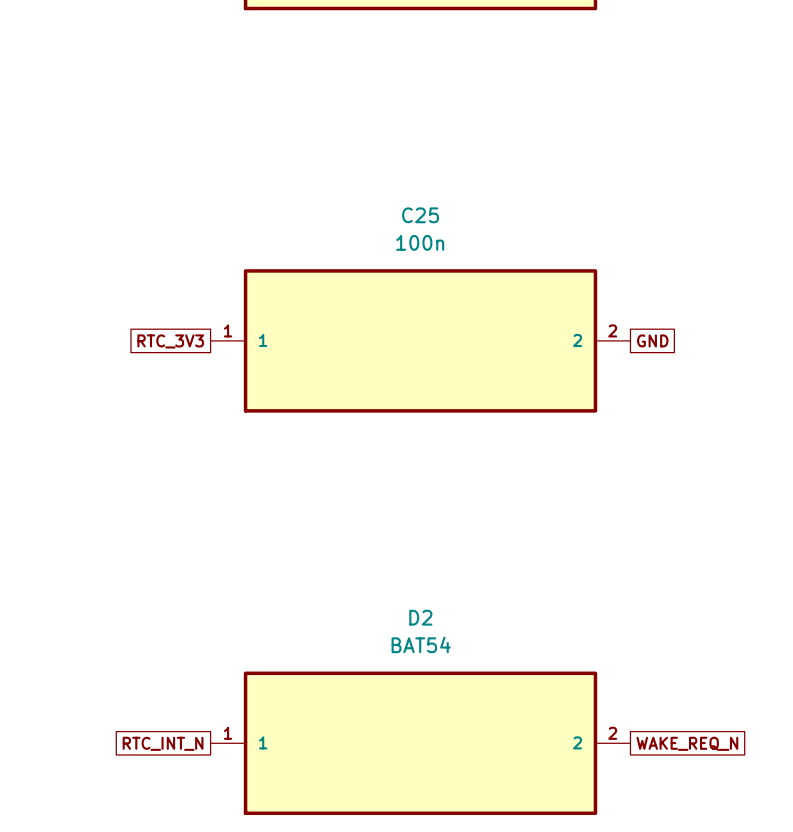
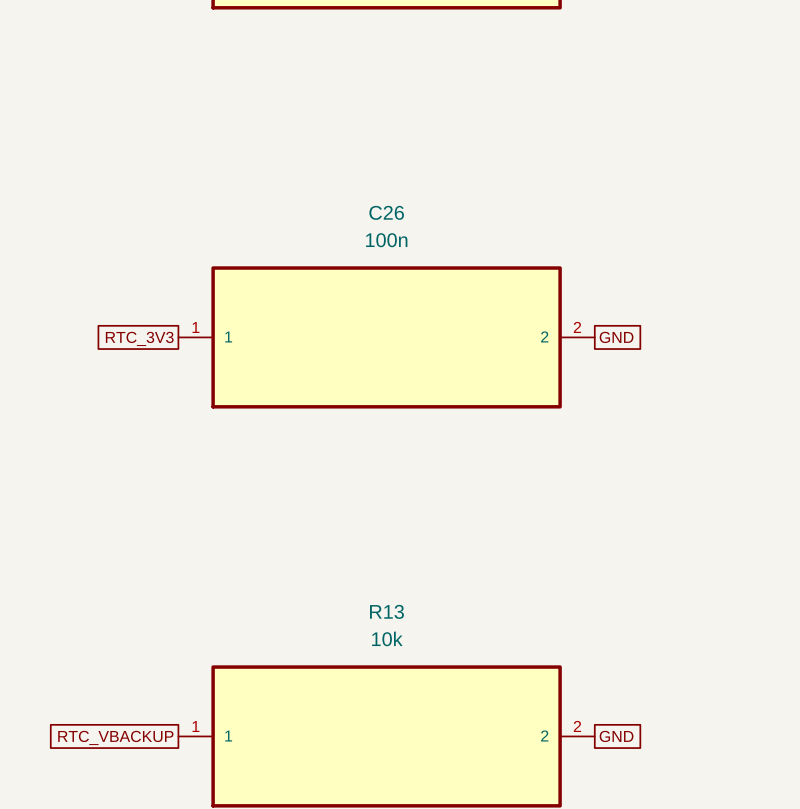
C25 name: C25 (420, 215) -> C26 (386, 212)
D2 name: D2 (420, 617) -> R13 (386, 611)
D2 value: BAT54 (421, 644) -> 10k (387, 638)
global label: RTC_INT_N (163, 743) -> RTC_VBACKUP (115, 737)
global label: WAKE_REQ_N (687, 743) -> GND (616, 736)

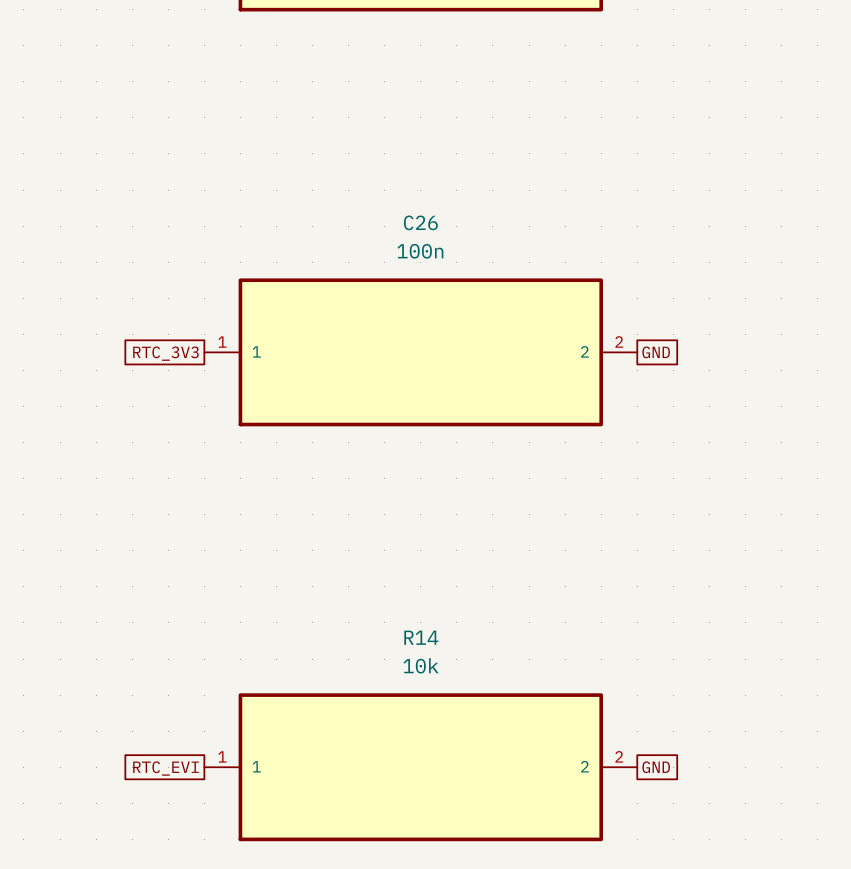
R13 name: R13 (386, 611) -> R14 (421, 637)
global label: RTC_VBACKUP (115, 737) -> RTC_EVI (165, 768)

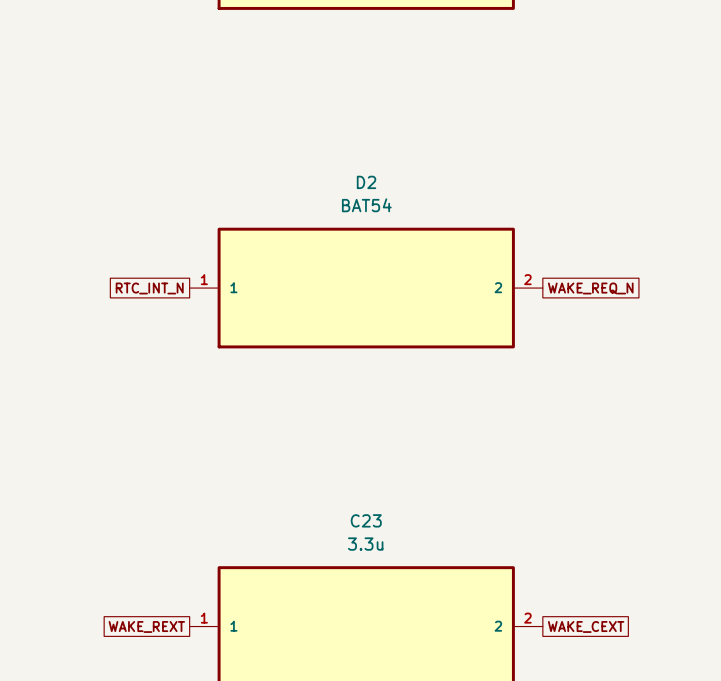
C26 name: C26 (420, 222) -> D2 (366, 182)
C26 value: 100n (420, 251) -> BAT54 (366, 205)
global label: GND (656, 352) -> WAKE_REQ_N (590, 288)
global label: RTC_3V3 (165, 353) -> RTC_INT_N (149, 288)
R14 name: R14 (421, 637) -> C23 (366, 520)
R14 value: 10k (421, 665) -> 3.3u (365, 544)
global label: GND (656, 767) -> WAKE_CEXT (586, 626)
global label: RTC_EVI (165, 768) -> WAKE_REXT (146, 626)

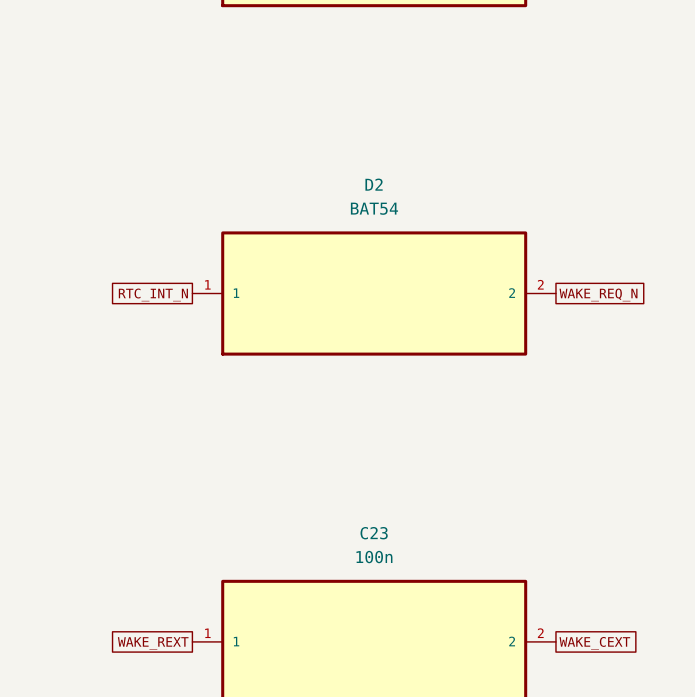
C23 value: 3.3u (365, 544) -> 100n (374, 557)

